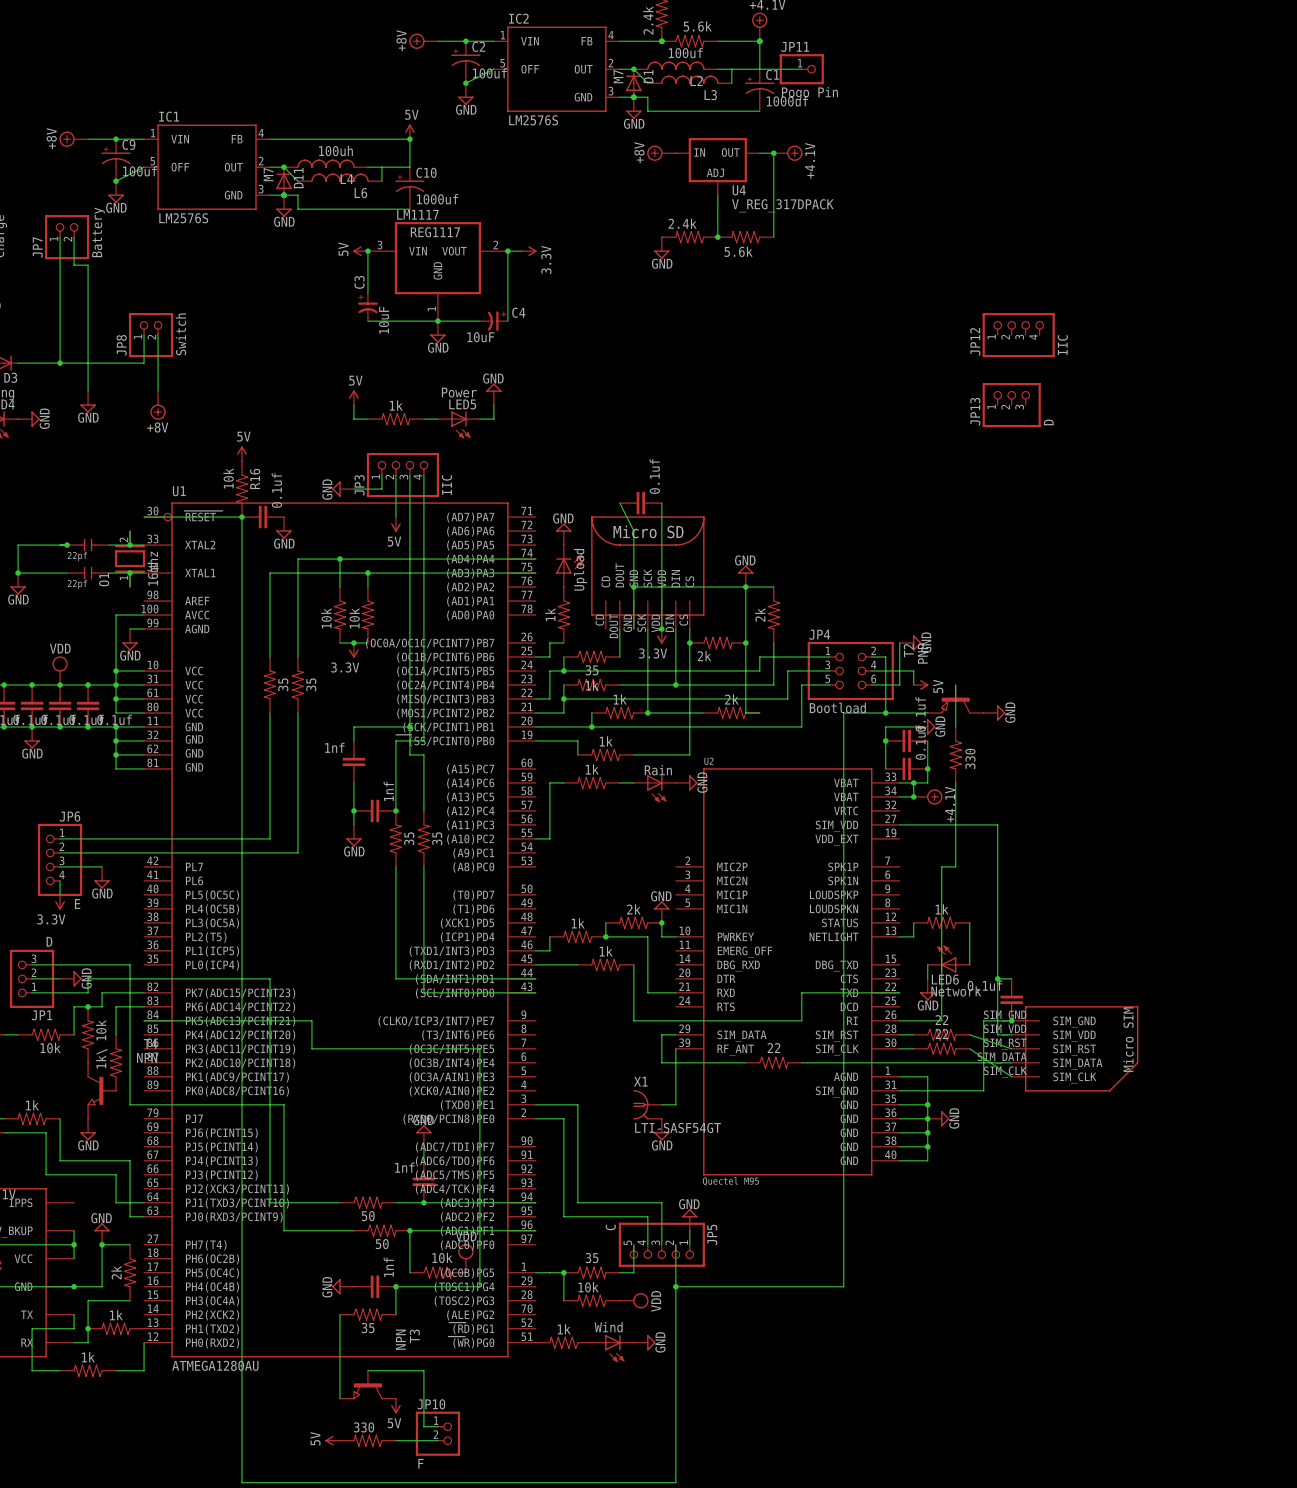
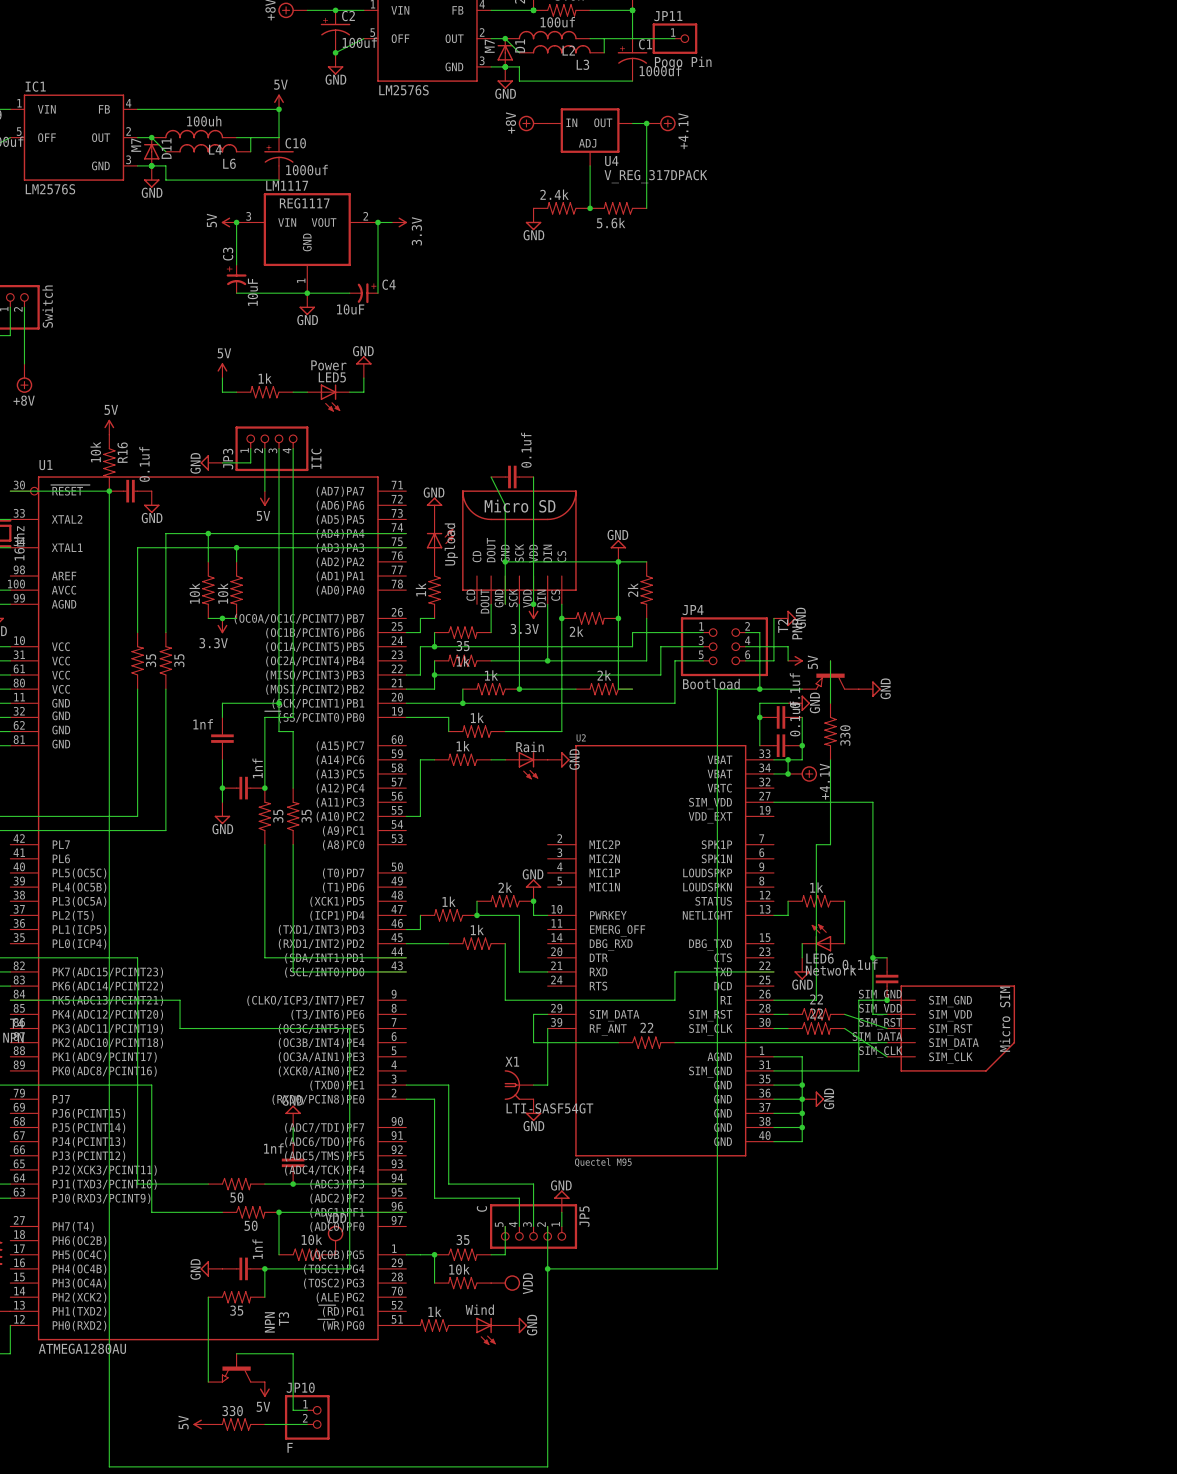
JP12: IIC (1018, 335) -> none
JP13: D (1011, 405) -> none

